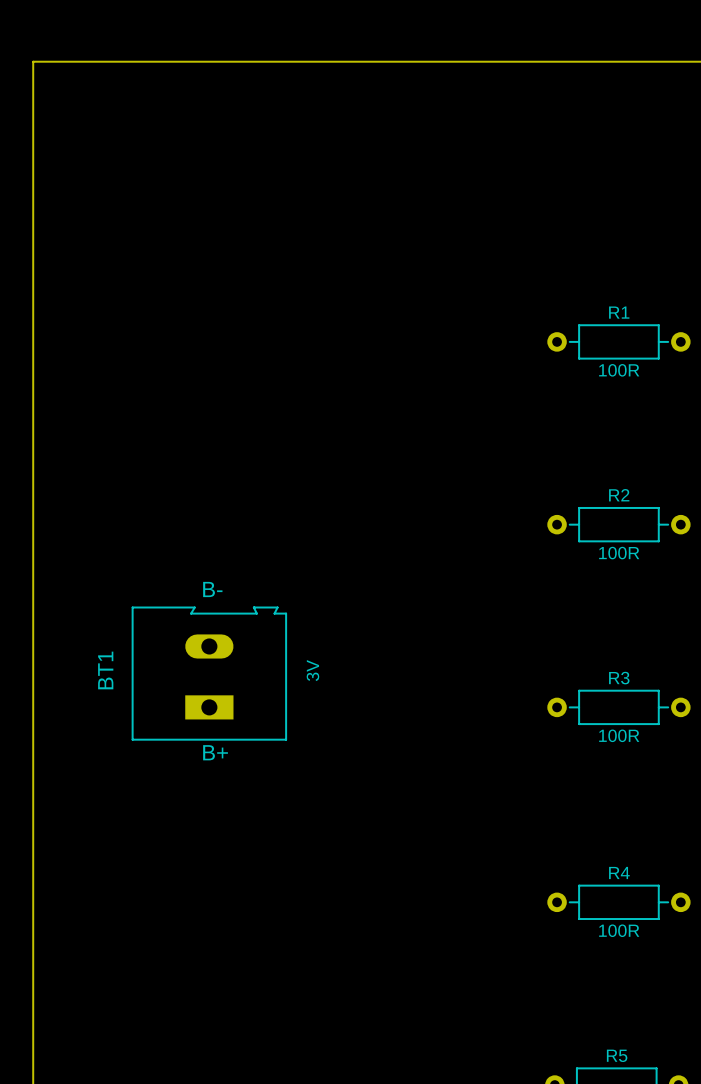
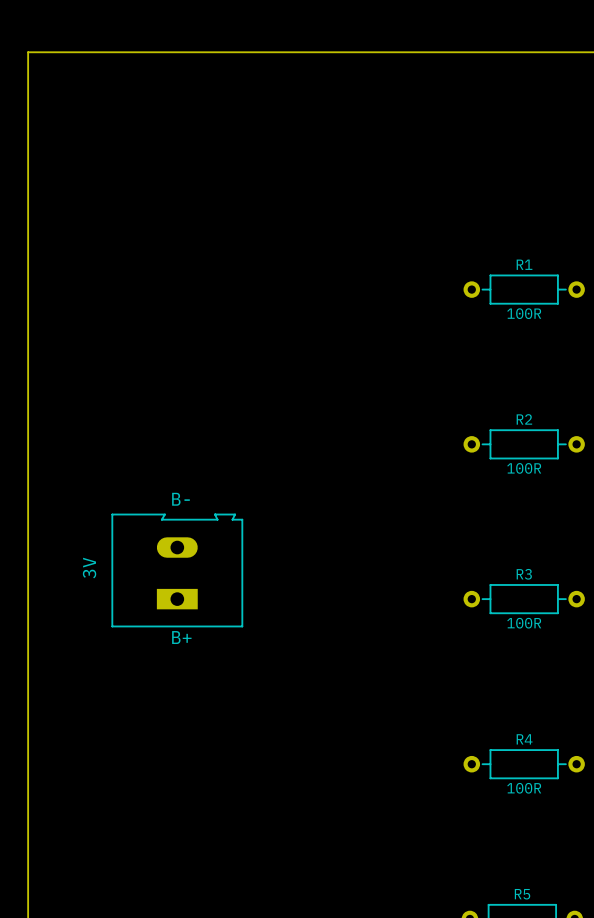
BT1 name: BT1 (105, 670) -> 3V (89, 568)
BT1 value: 3V (312, 670) -> none

